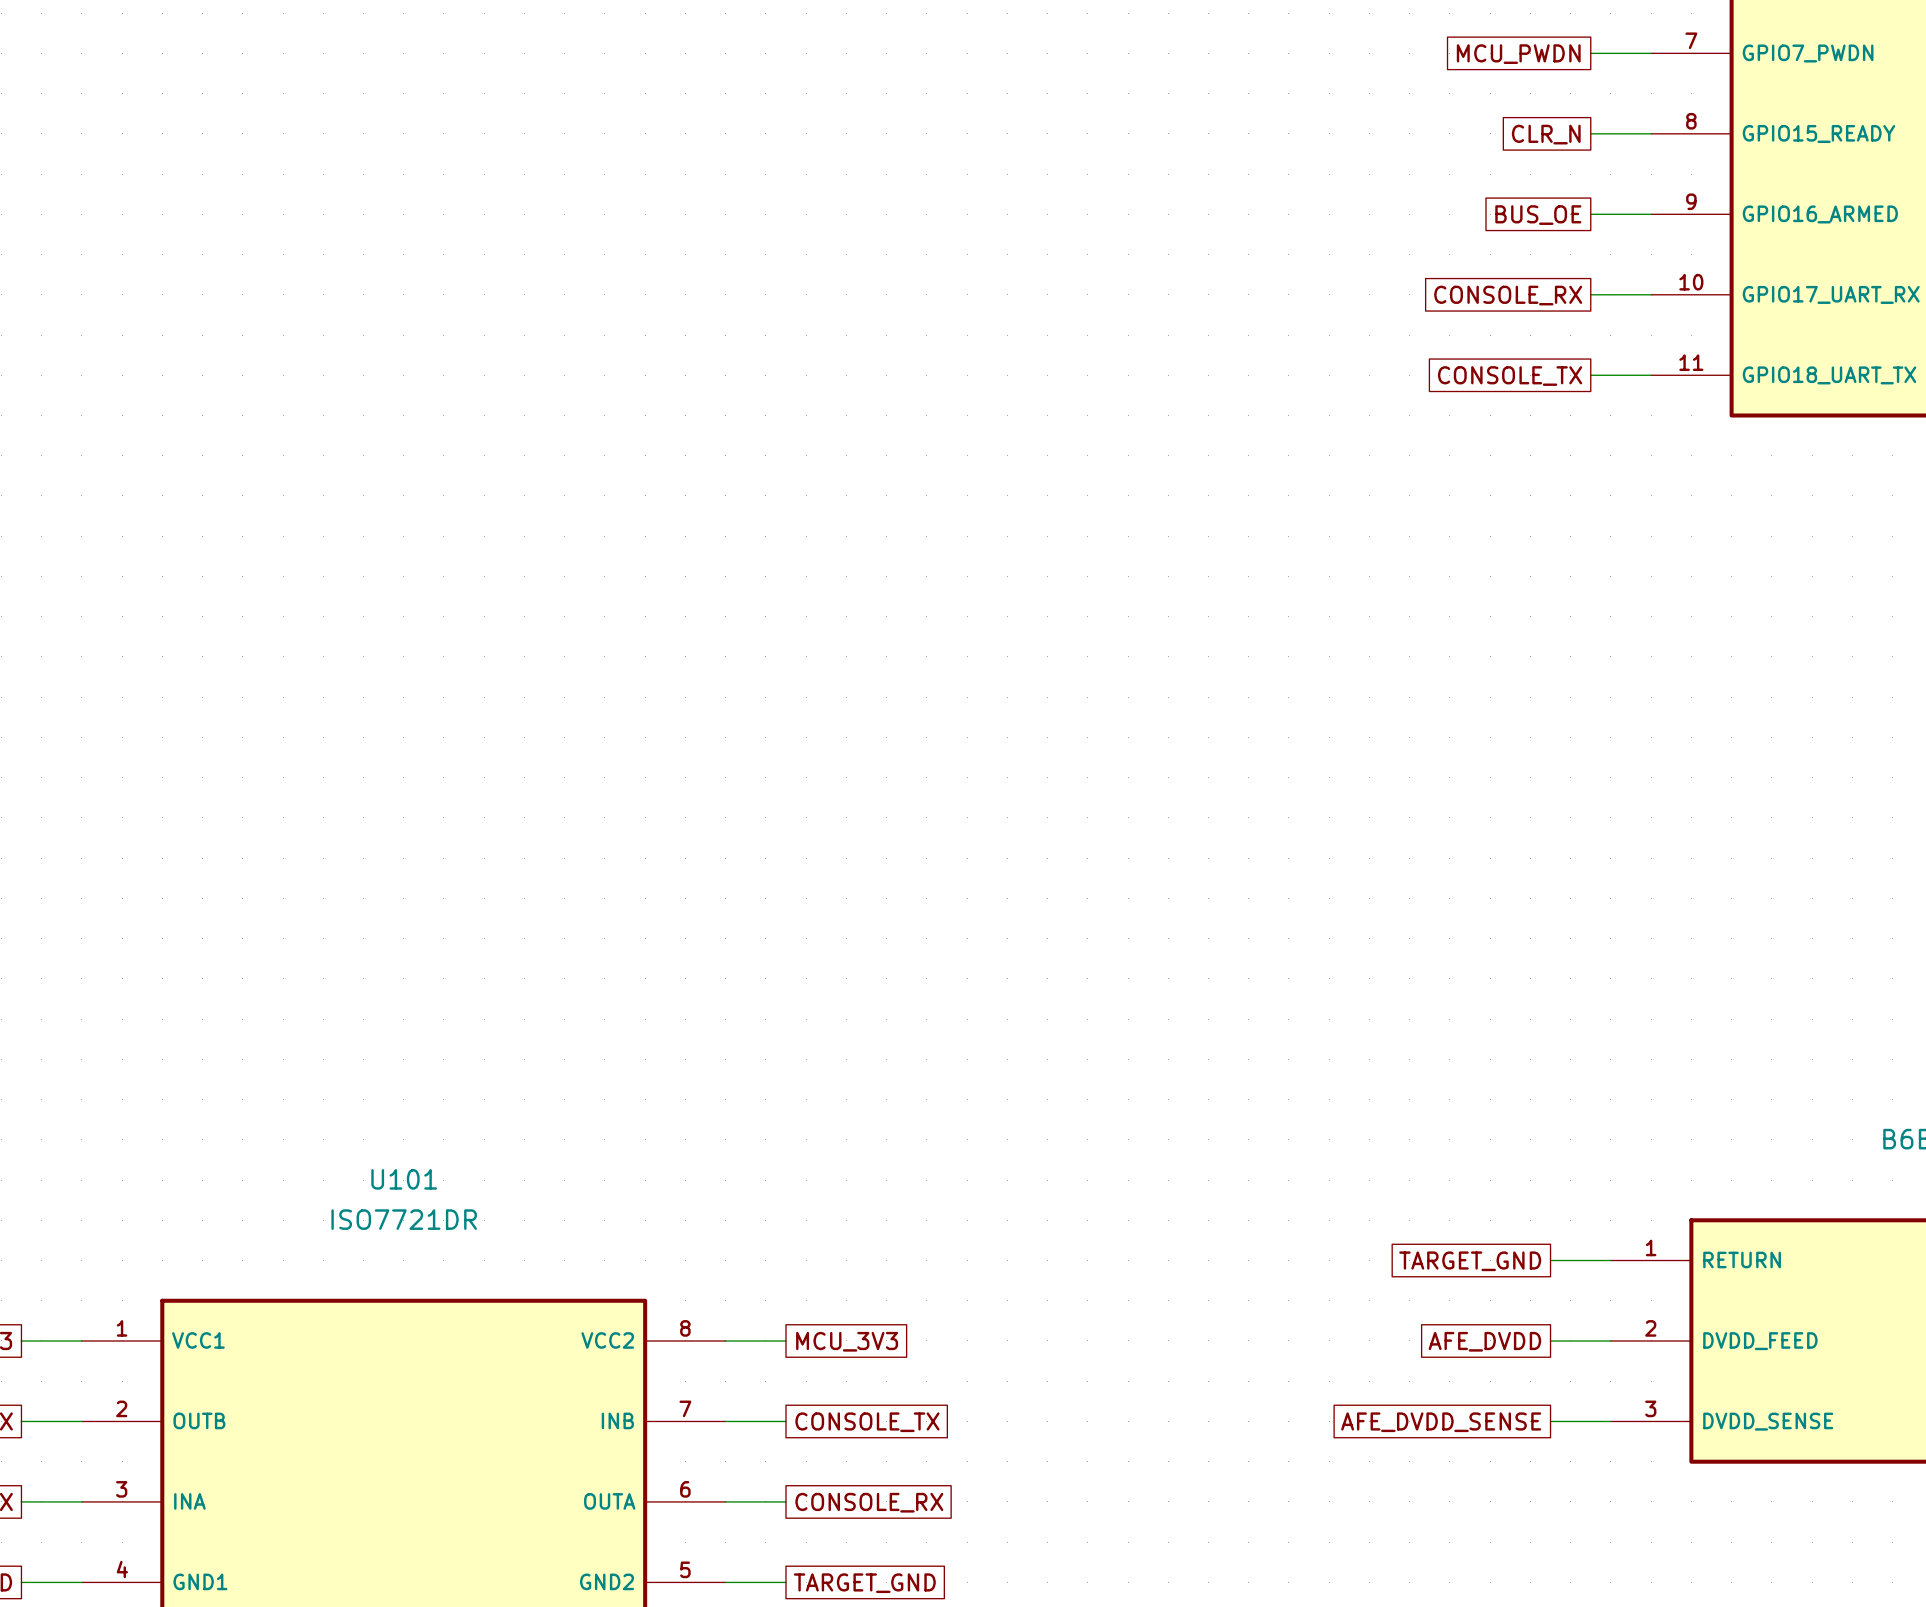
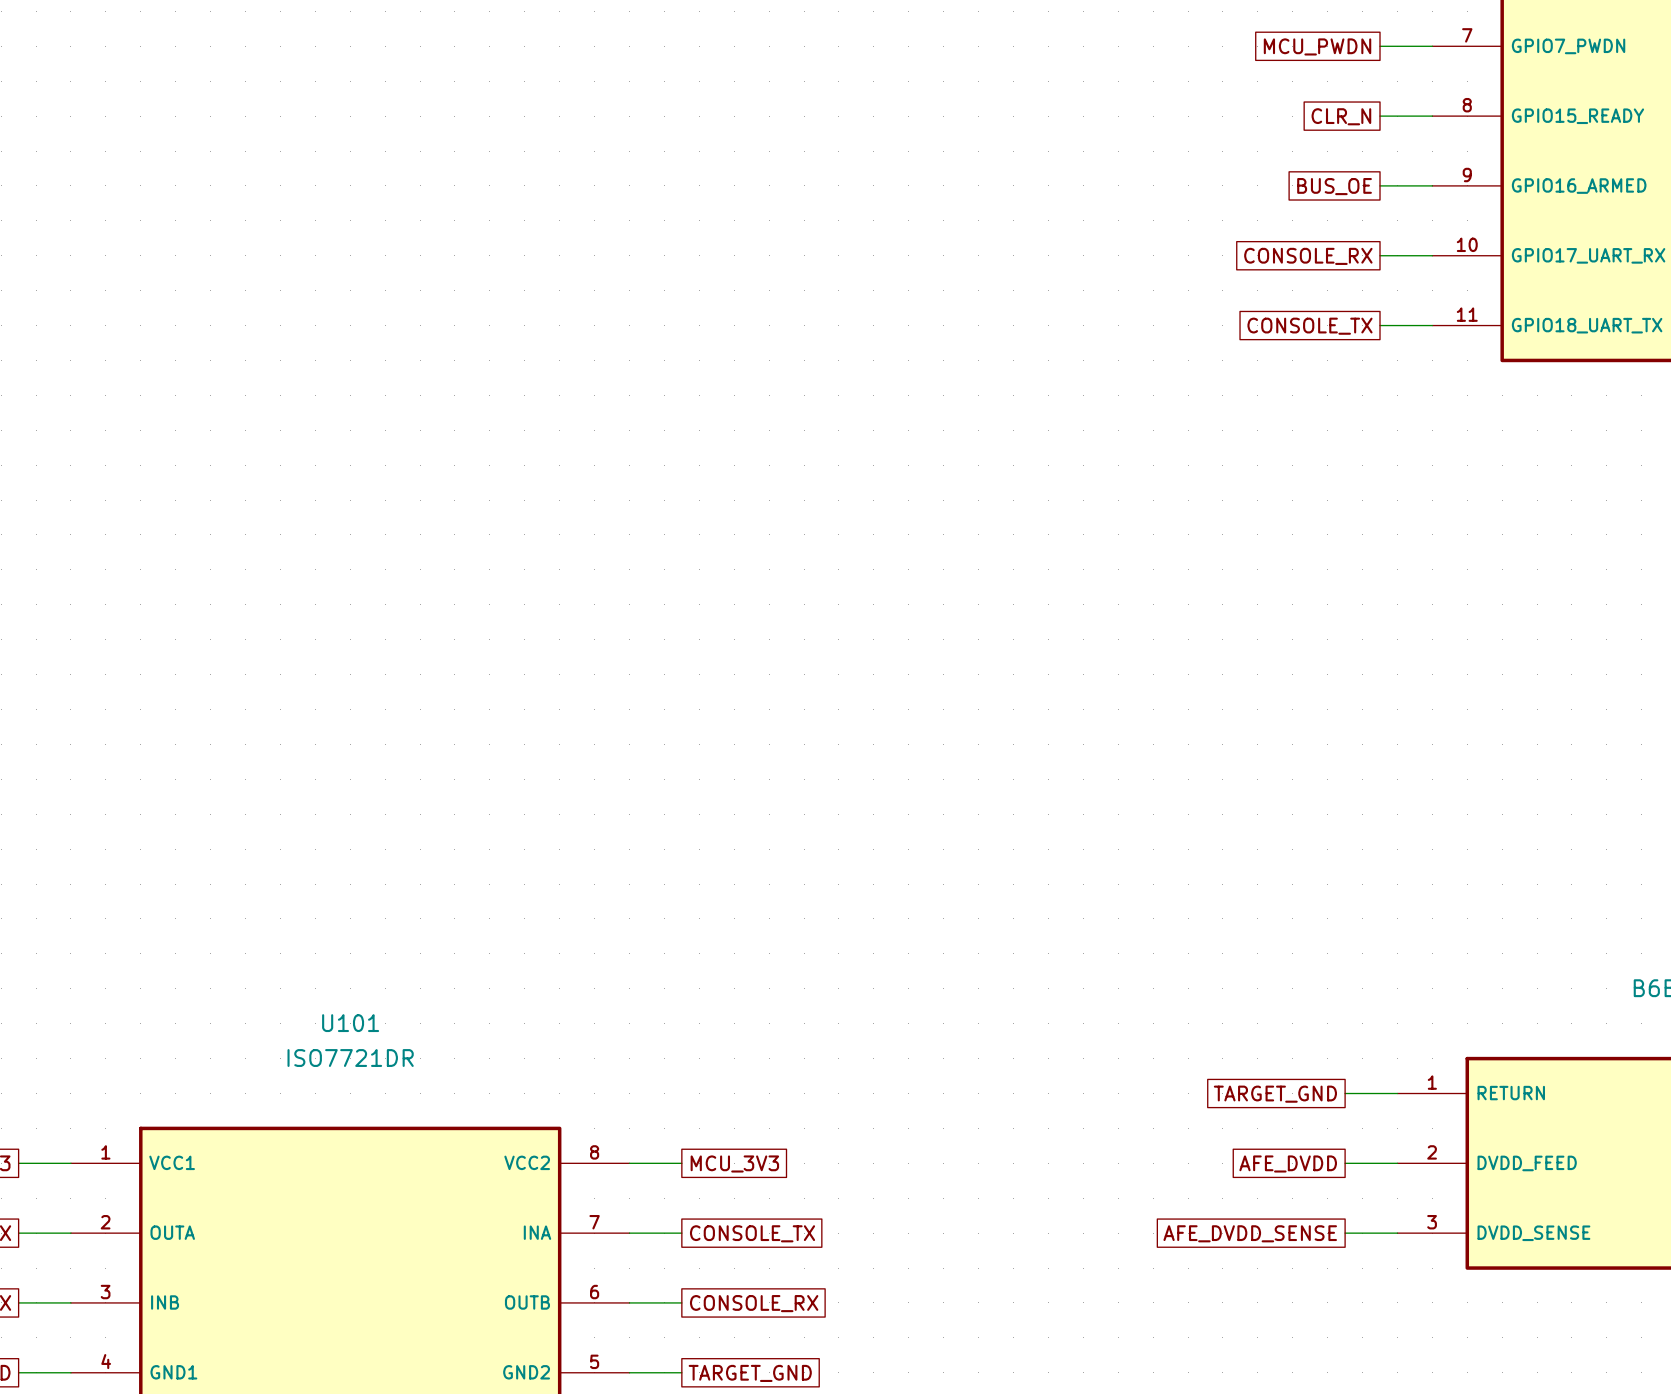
U101 pin name: OUTB (199, 1420) -> OUTA (172, 1232)
U101 pin name: INB (617, 1420) -> INA (537, 1232)
U101 pin name: INA (189, 1501) -> INB (165, 1302)
U101 pin name: OUTA (609, 1501) -> OUTB (527, 1302)

